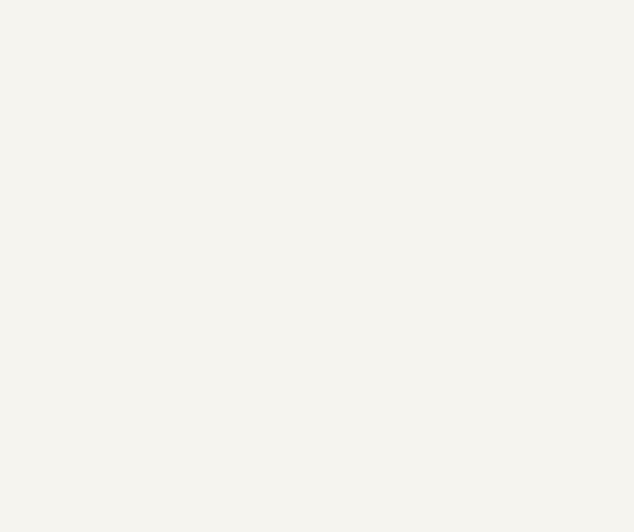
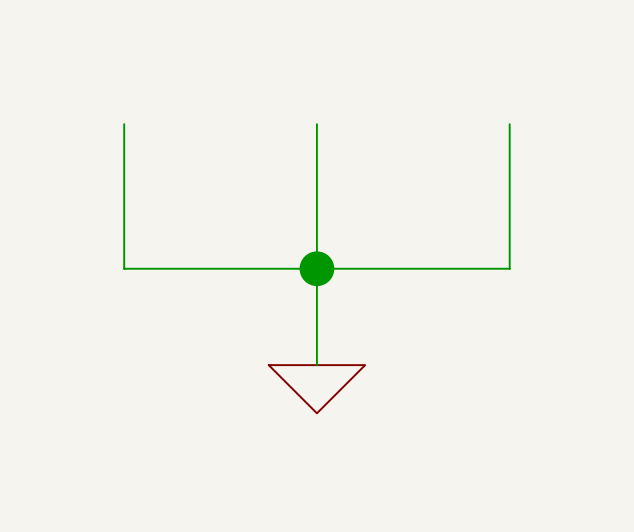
wire: none -> (124, 124) (124, 268) (509, 268) (509, 124)
wire: none -> (316, 124) (316, 365)
junction: none -> (316, 268)
power symbol: none -> (316, 389)

